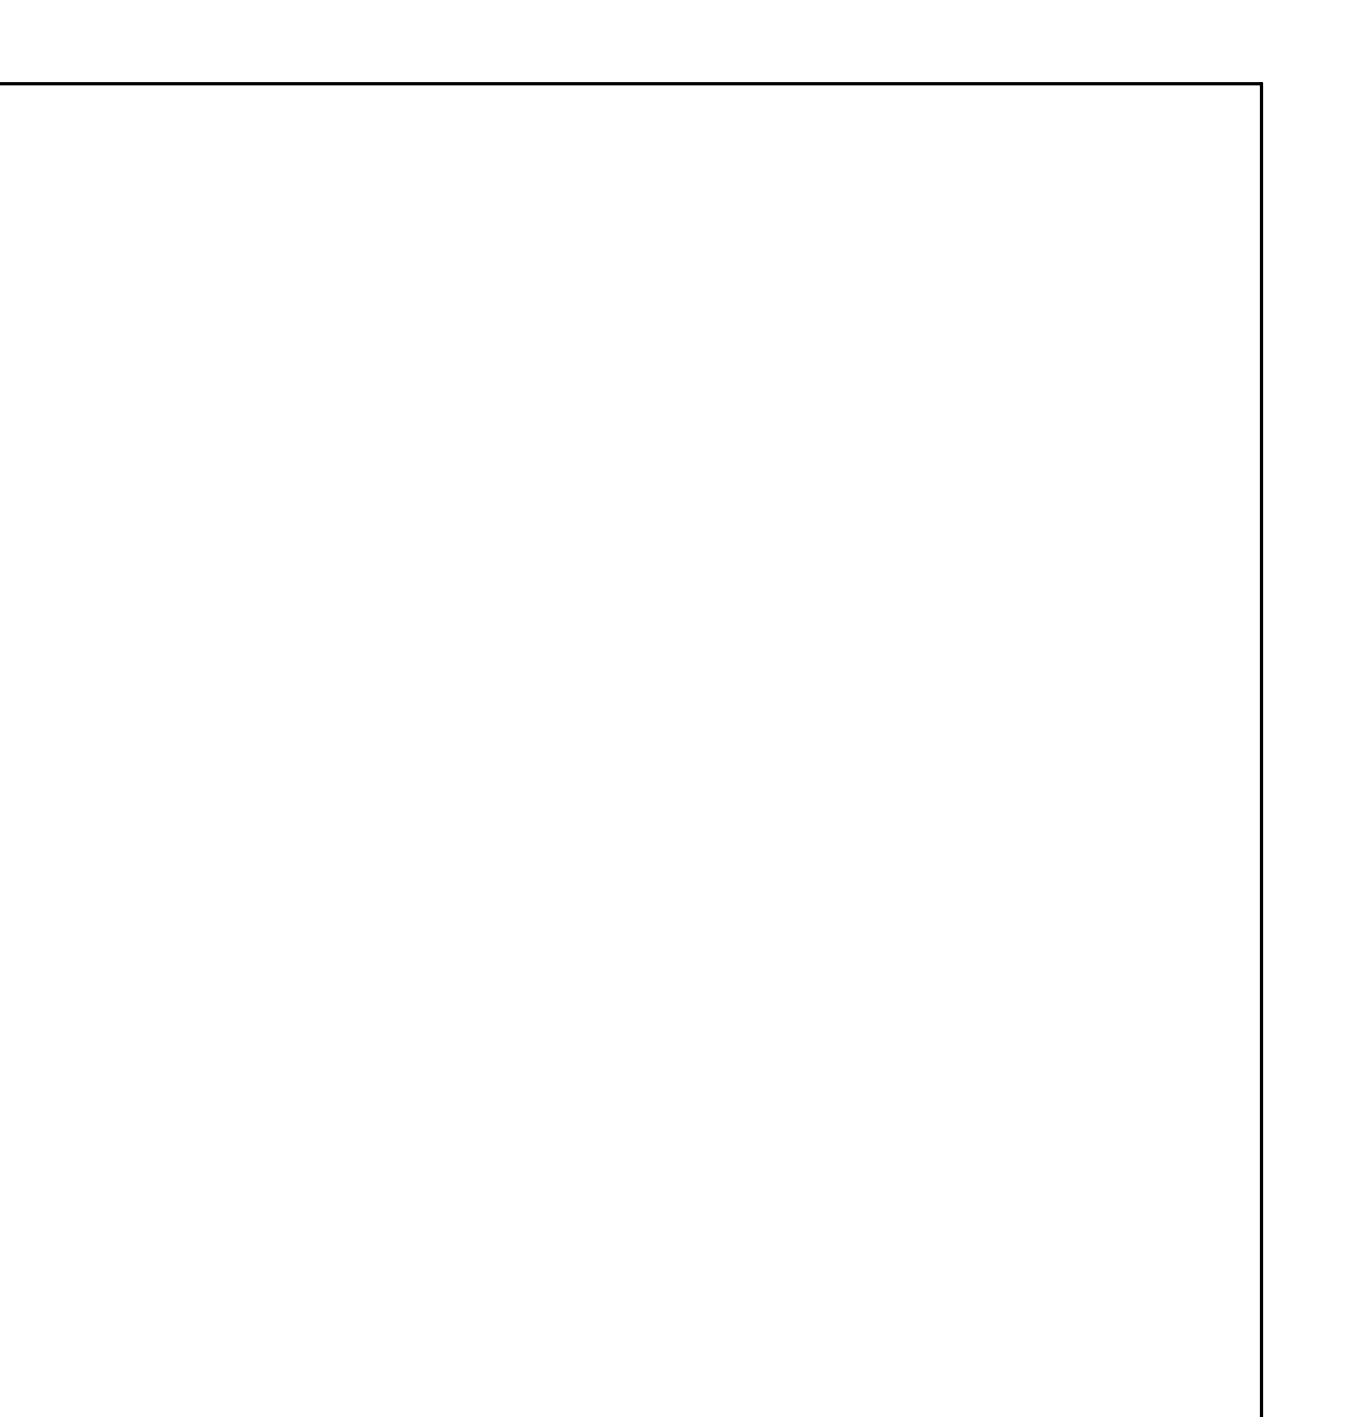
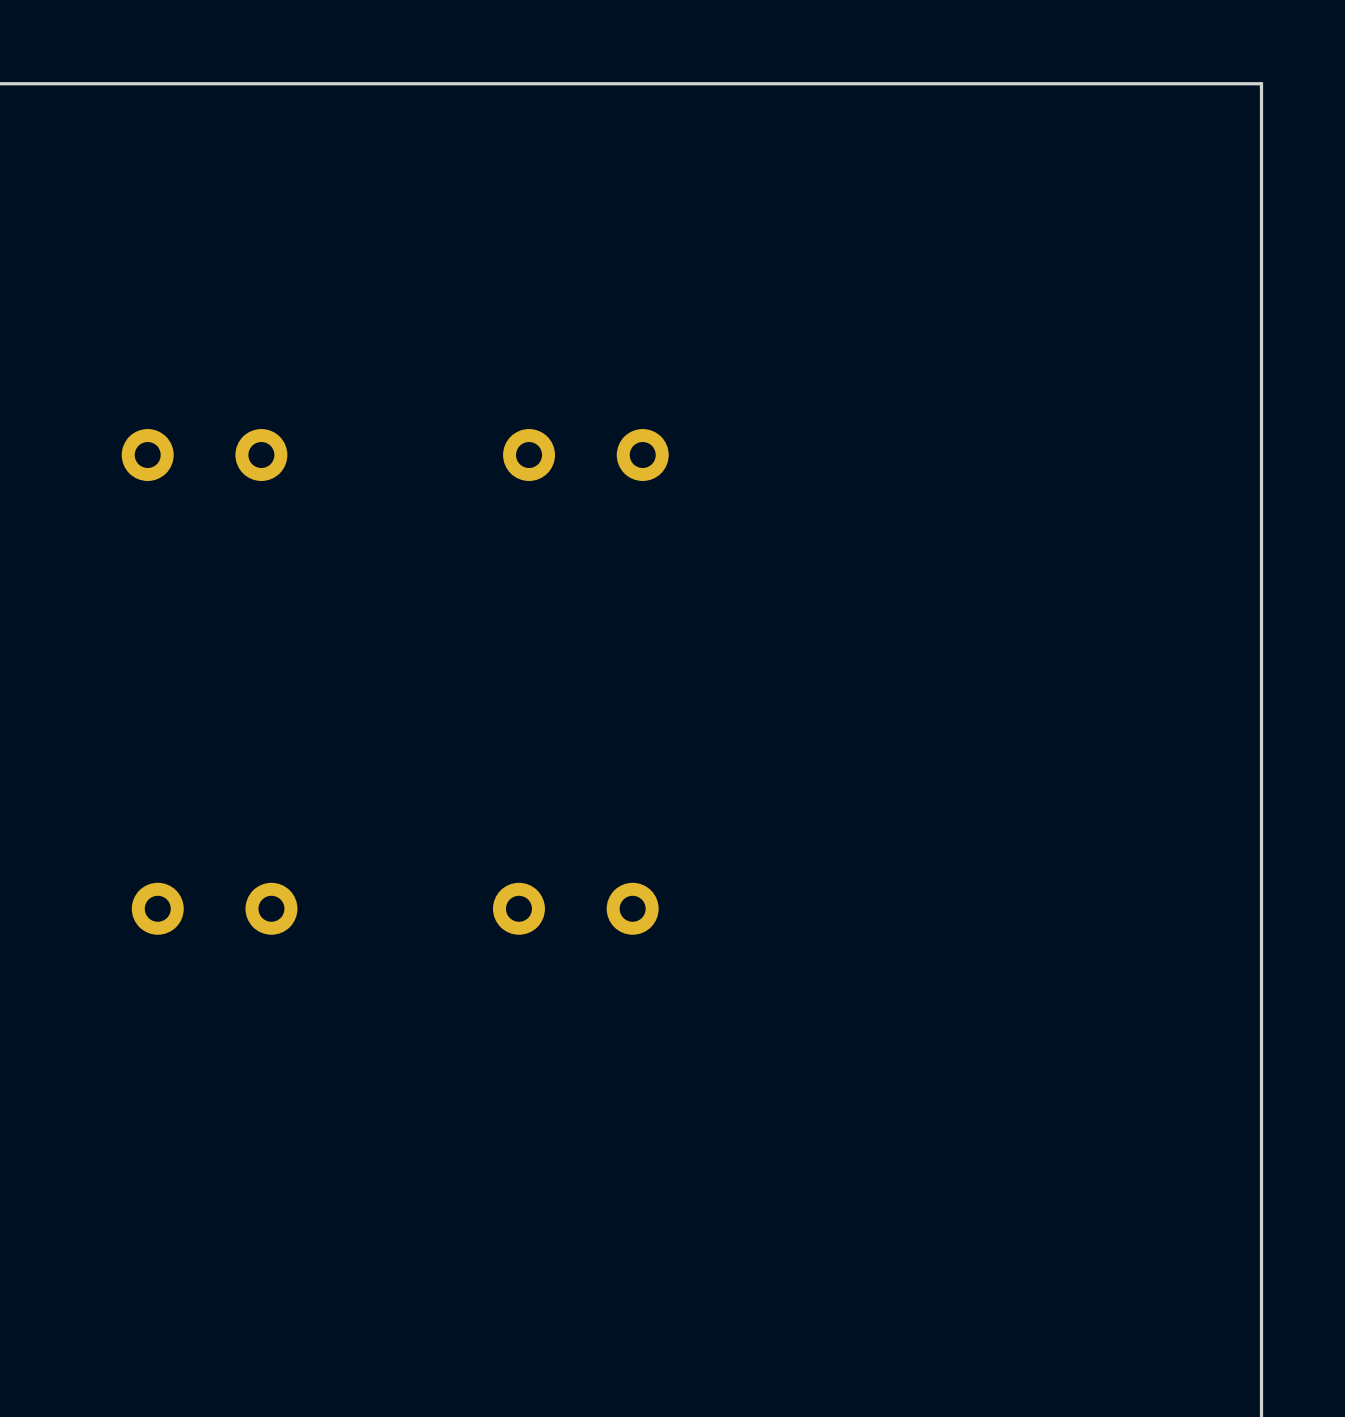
part: none -> (204, 455)
part: none -> (585, 455)
part: none -> (214, 908)
part: none -> (575, 908)

